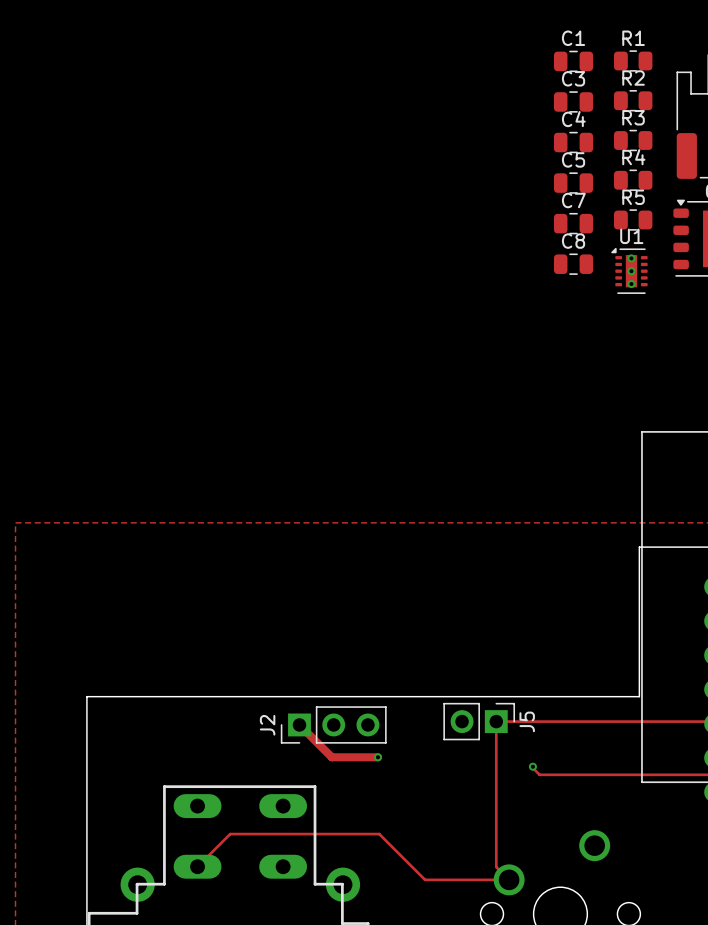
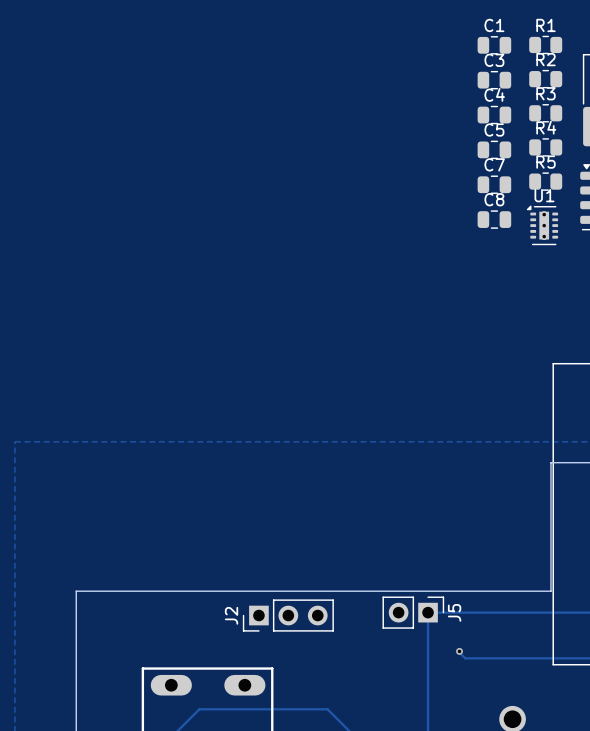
track: (299, 724) (331, 757) (377, 757) -> none
via: (377, 757) -> none

